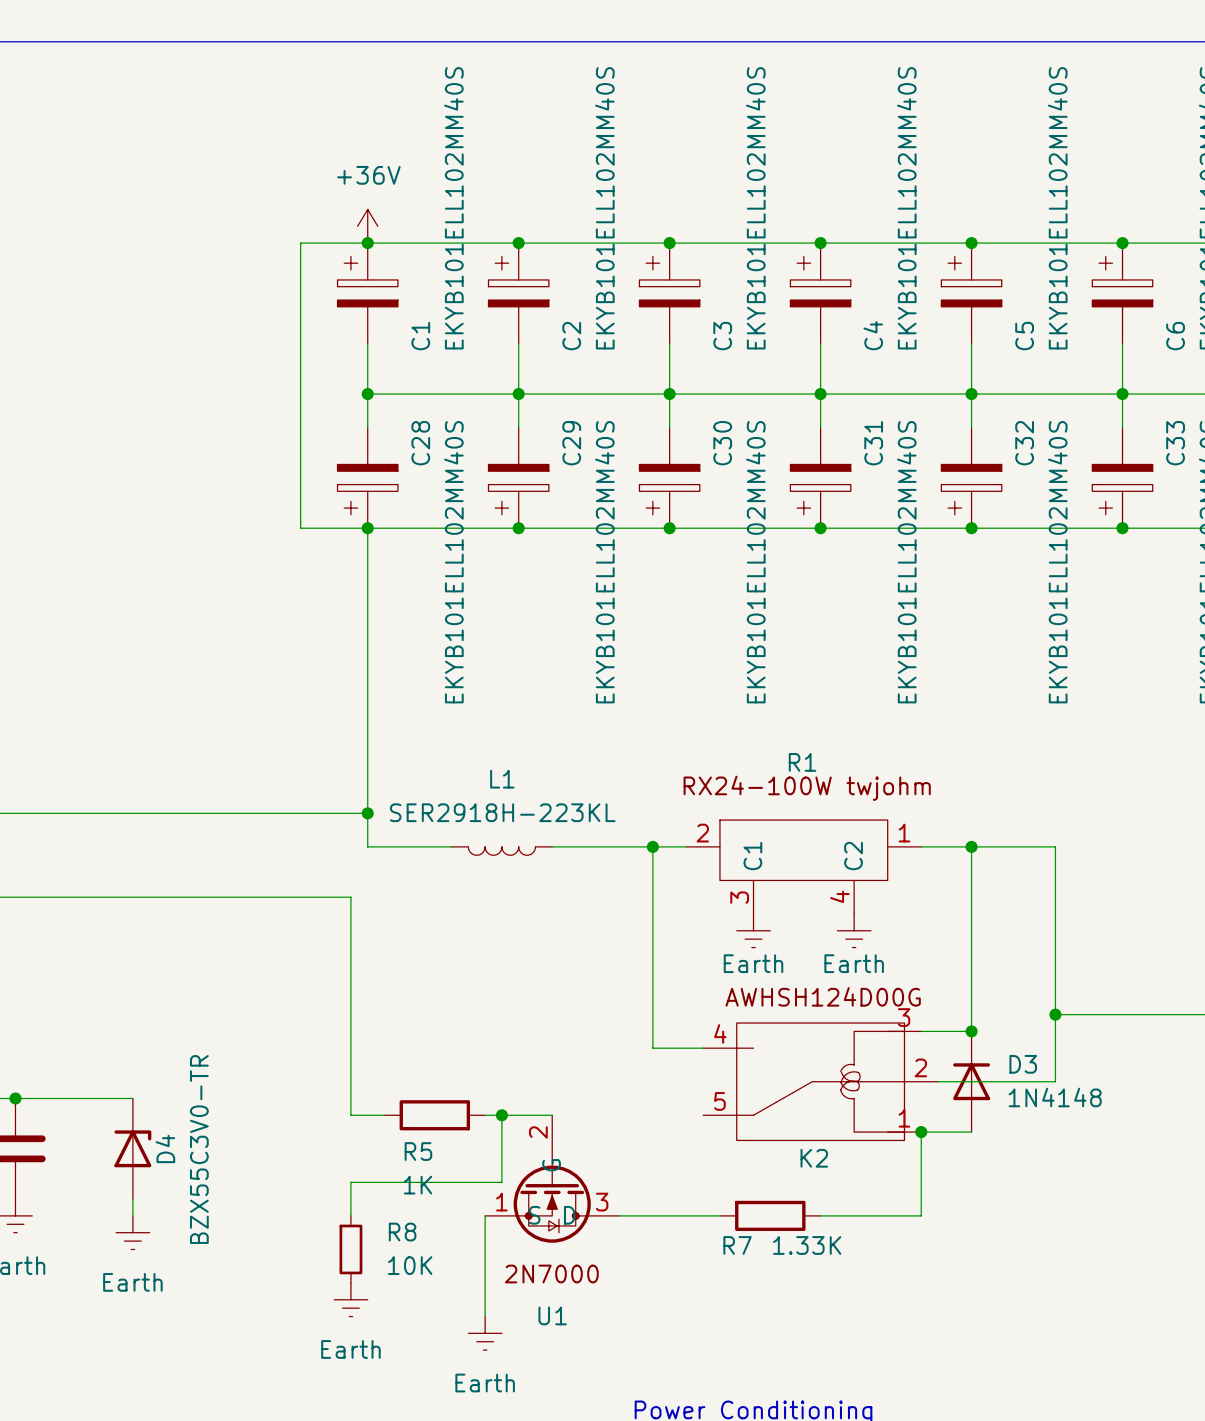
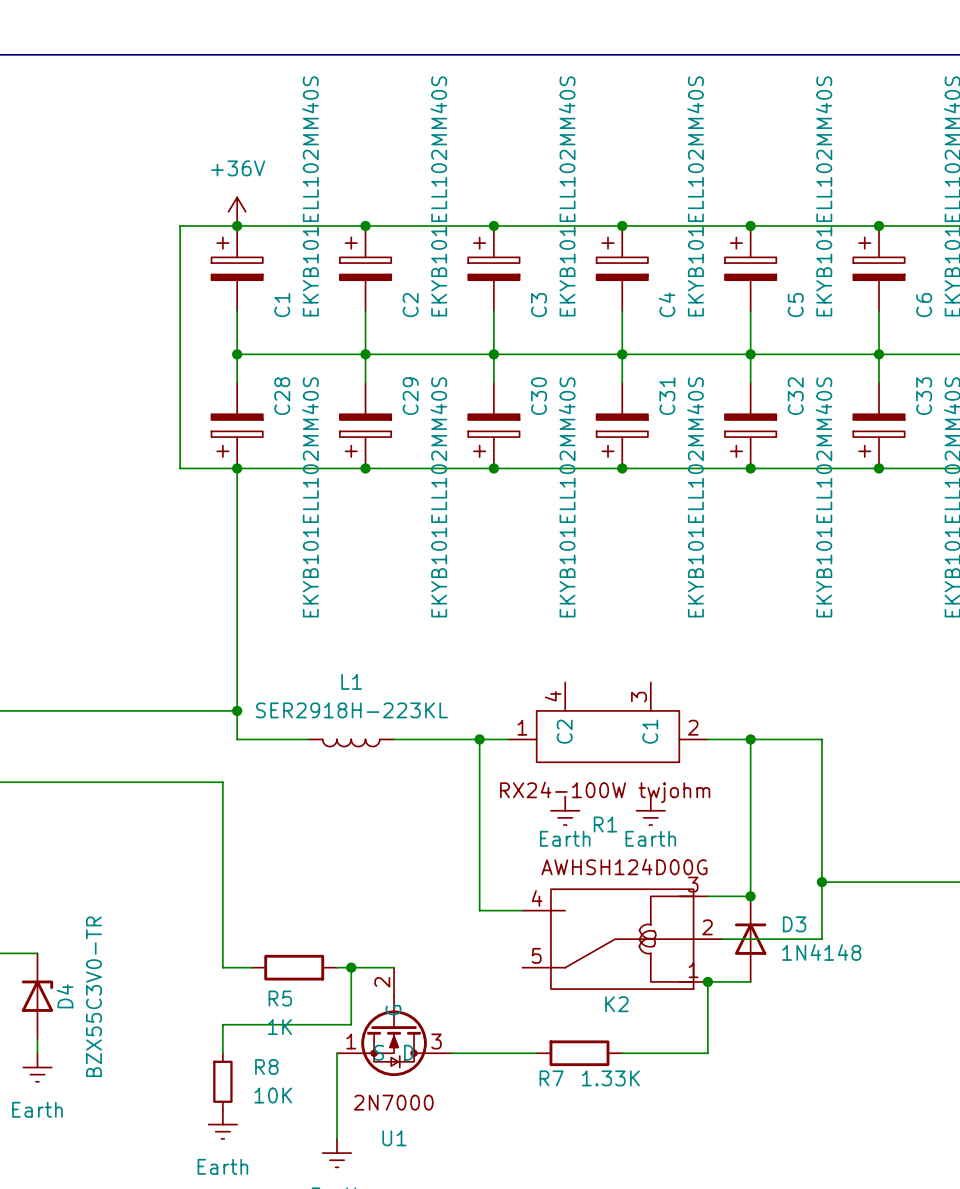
R1 rotation: 0° (803, 850) -> 180° (608, 736)

